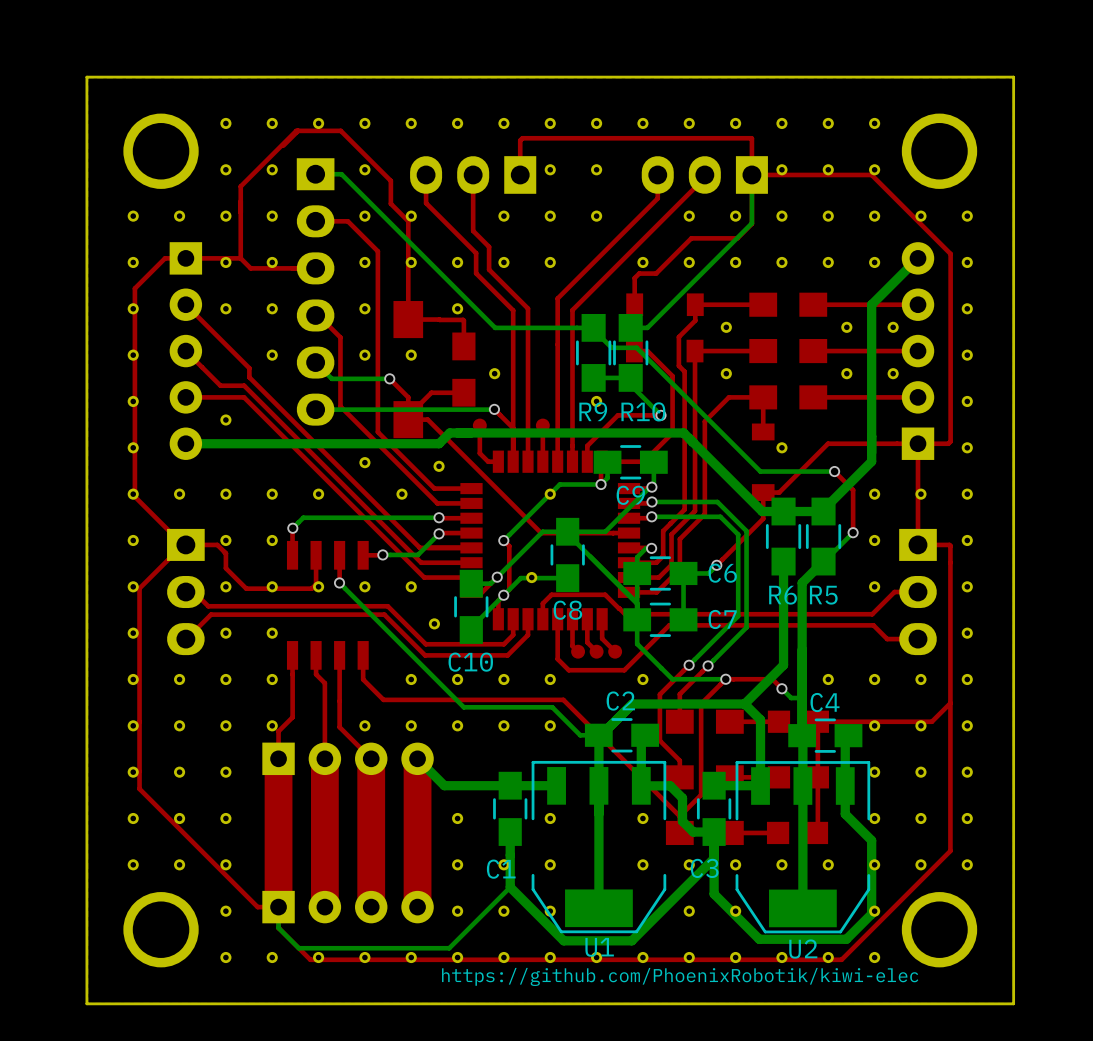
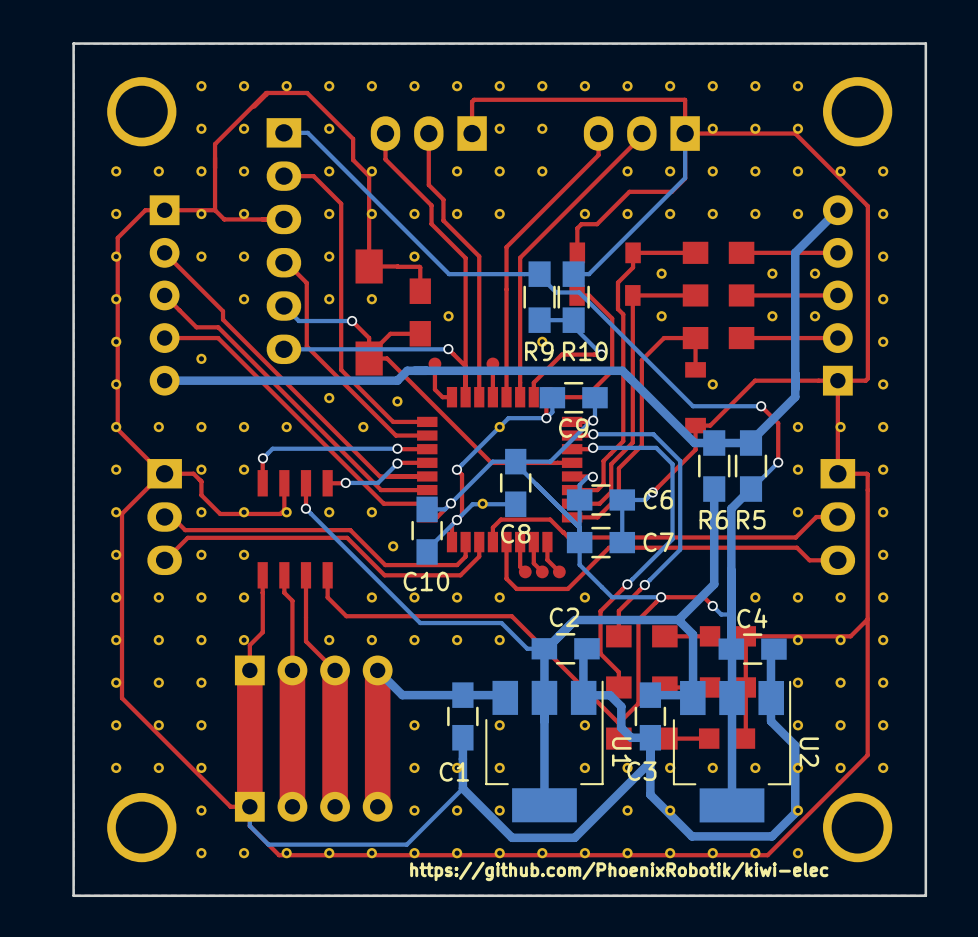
U1 footprint: [531, 760, 667, 934] -> [485, 680, 604, 823]
U2 footprint: [735, 761, 871, 934] -> [672, 680, 792, 823]
U1 name position: U1 (599, 947) -> U1 (621, 751)
U2 name position: U2 (803, 949) -> U2 (809, 752)

